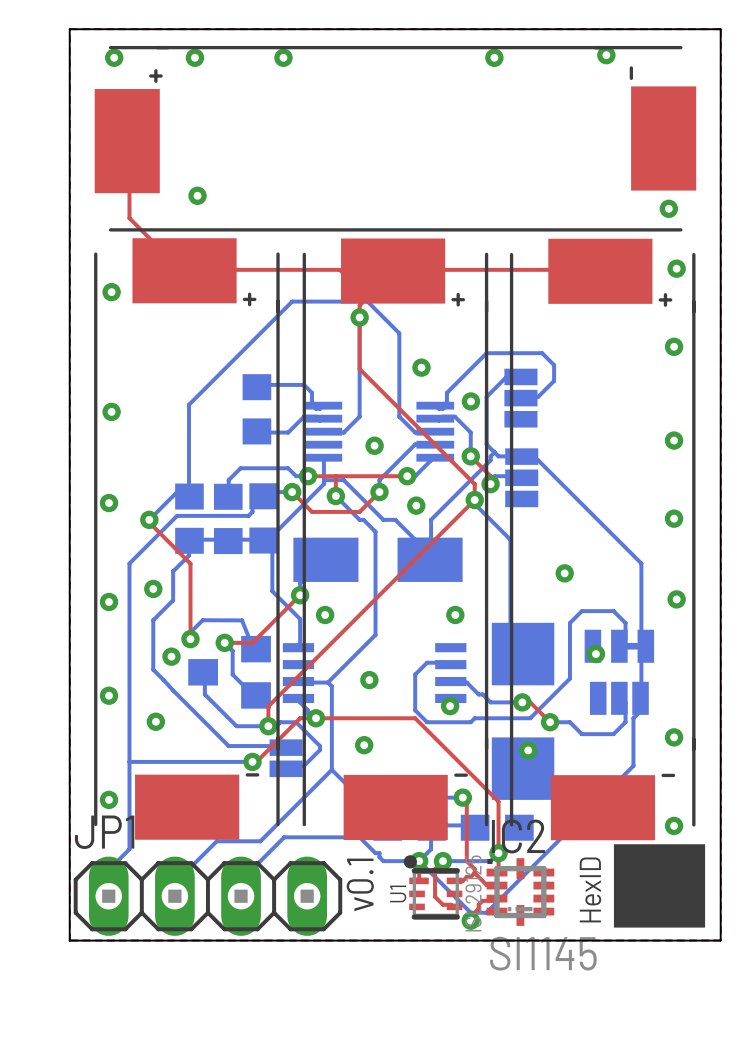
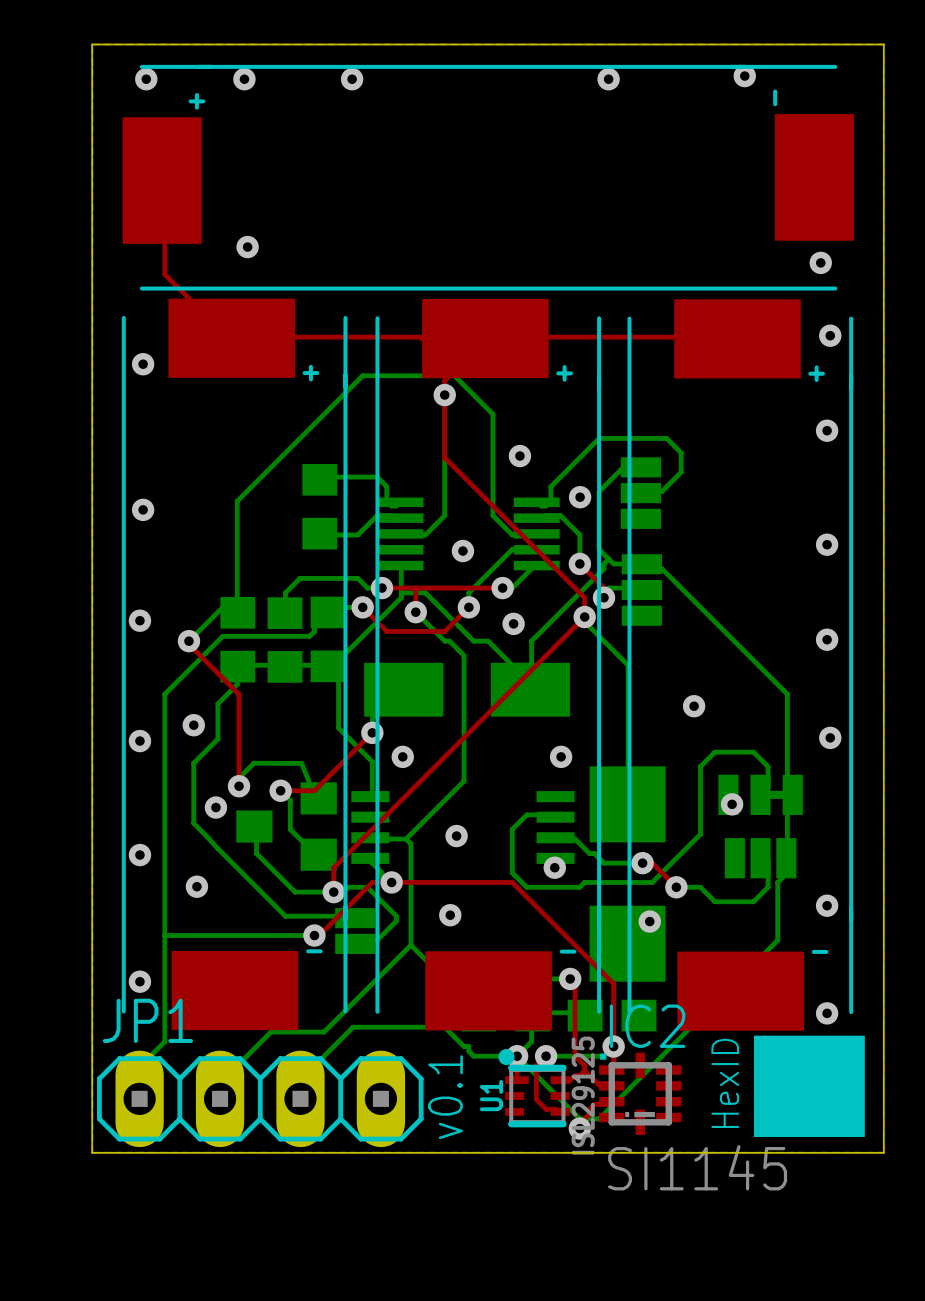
part position: (523, 711) -> (627, 874)

